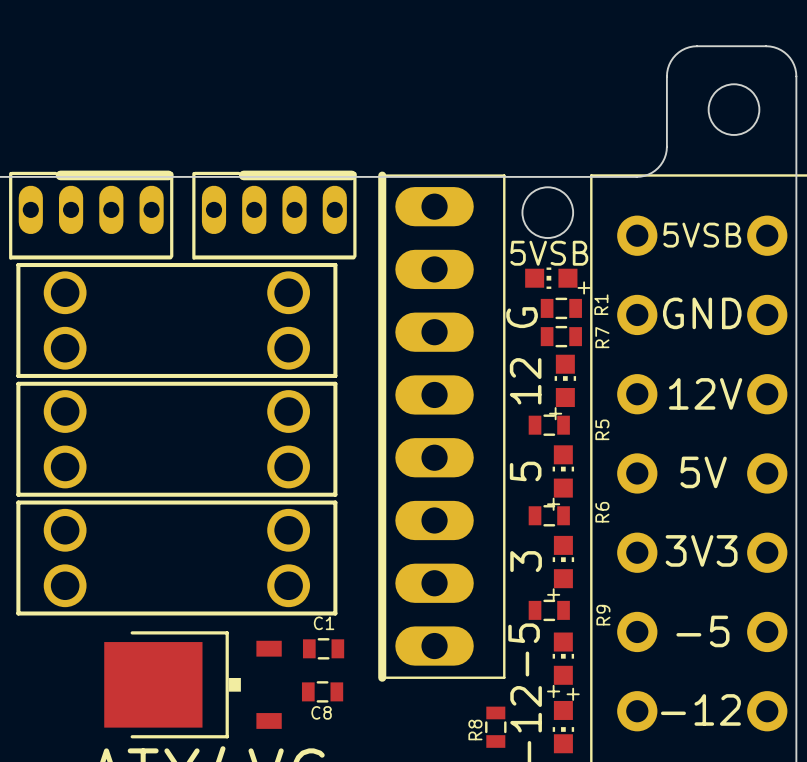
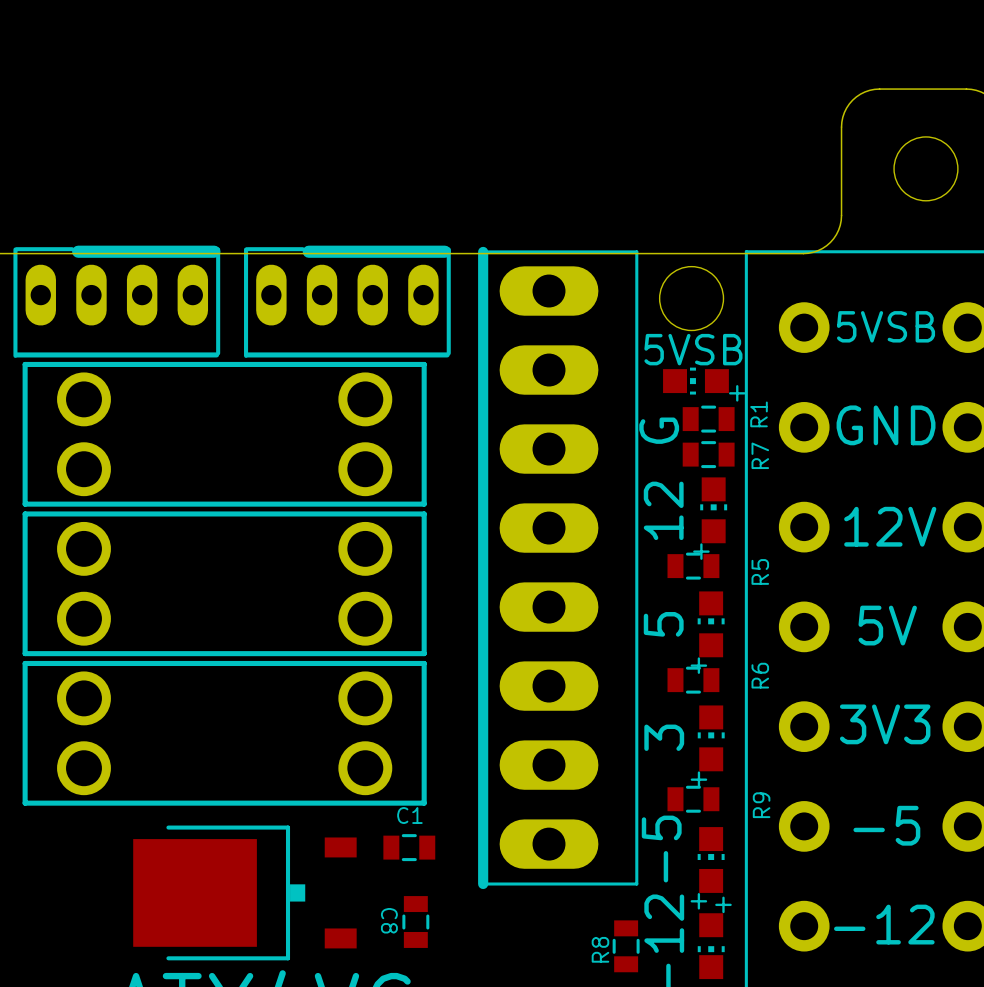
C8 rotation: 0° (322, 691) -> 90° clockwise (415, 922)

